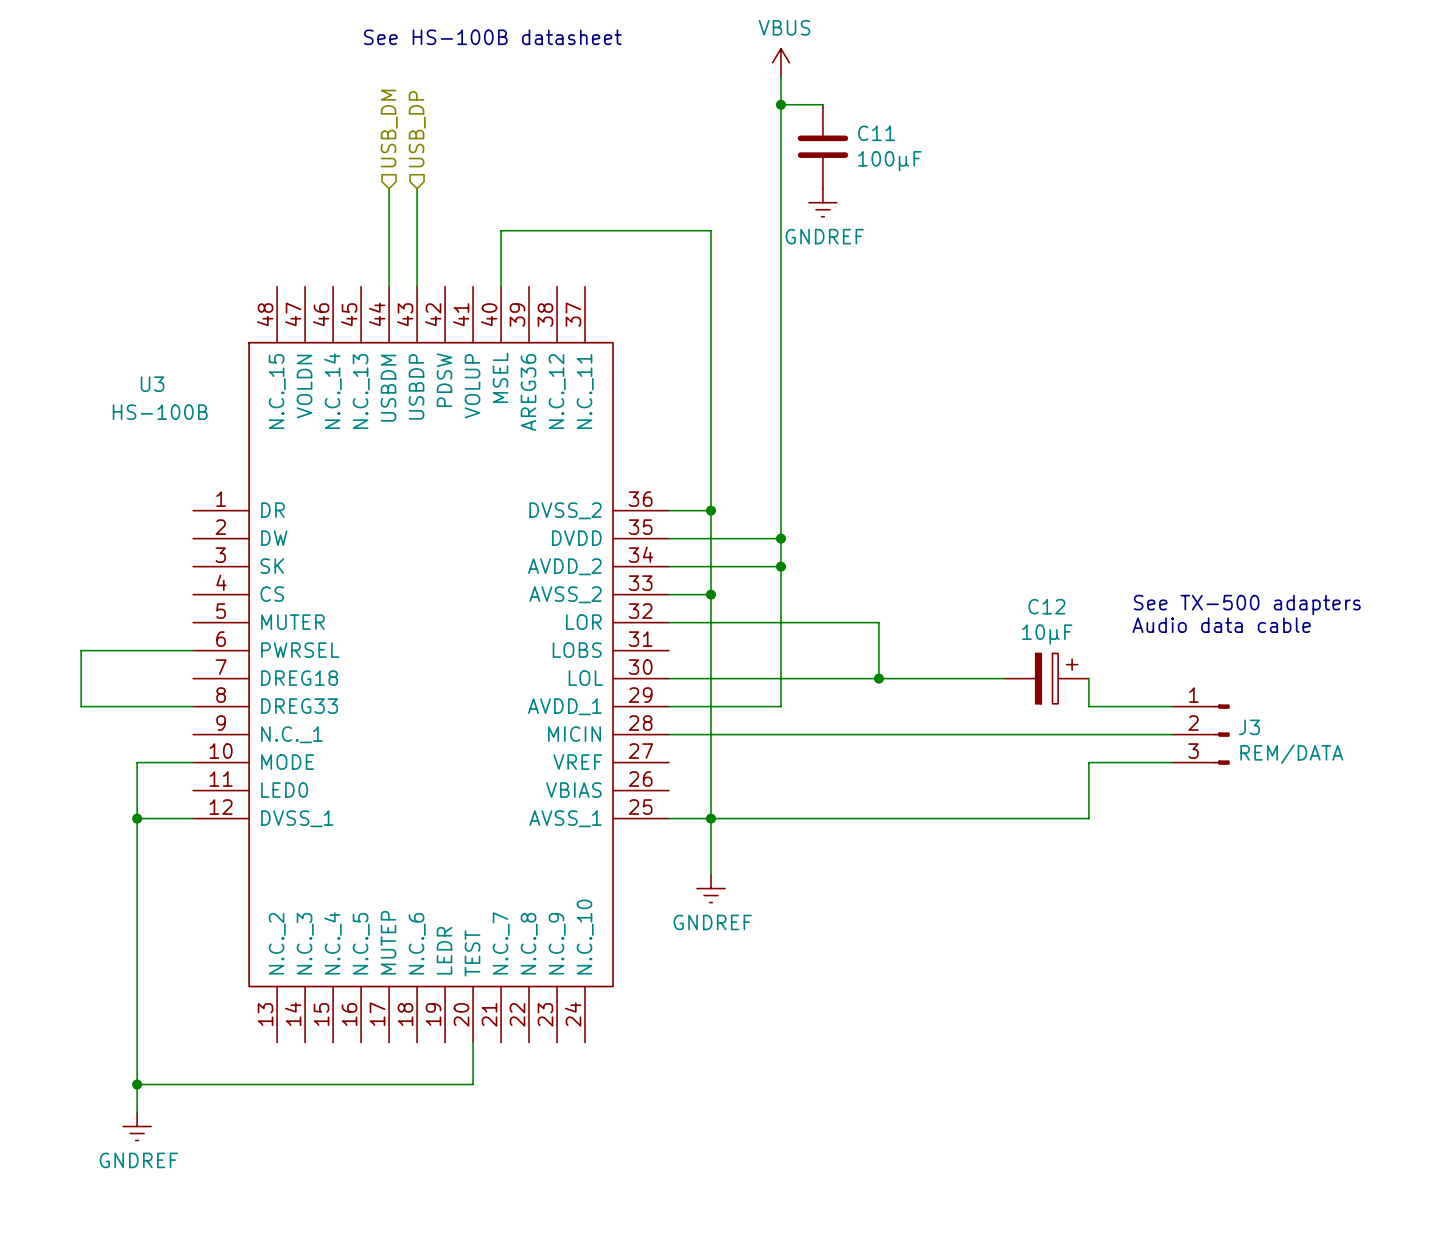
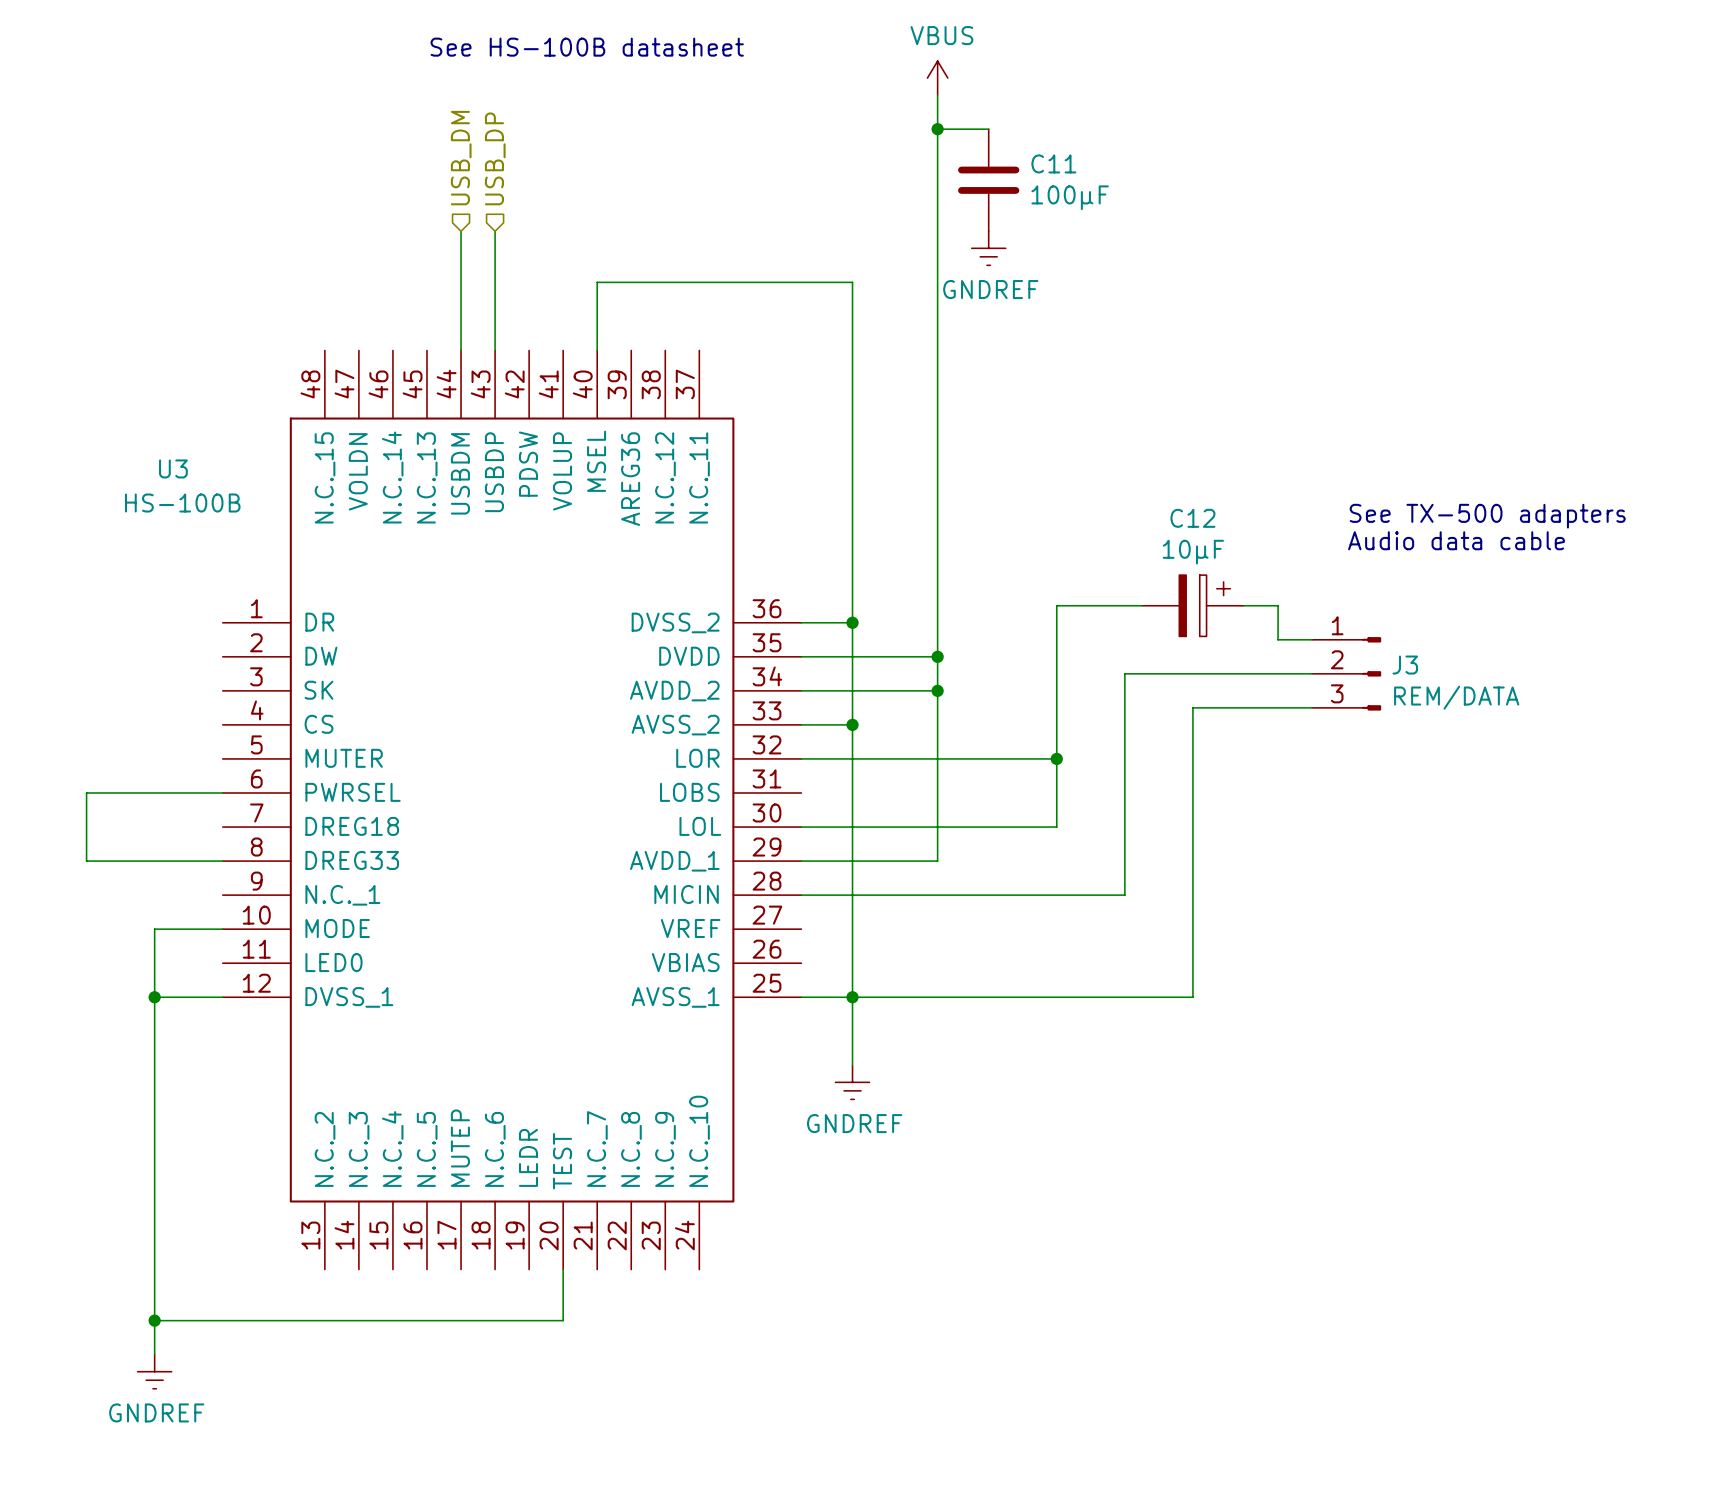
wire: none -> (1141, 605) (1056, 605) (1056, 758)
wire: none -> (1244, 605) (1278, 605) (1278, 639) (1312, 639)
text position: See TX-500 adapters (1247, 604) -> See TX-500 adapters (1487, 516)
text position: Audio data cable (1221, 625) -> Audio data cable (1456, 540)
wire: (878, 678) (1004, 678) -> none
junction position: (878, 678) -> (1056, 758)
C12 position: (1046, 678) -> (1192, 605)
wire: (1088, 678) (1088, 706) (1172, 706) -> none
wire: (934, 734) (1172, 734) -> (1124, 895) (1124, 673) (1312, 673)
J3 position: (1201, 734) -> (1346, 673)
wire: (1172, 762) (1088, 762) (1088, 818) (990, 818) -> (1312, 707) (1192, 707) (1192, 997)

